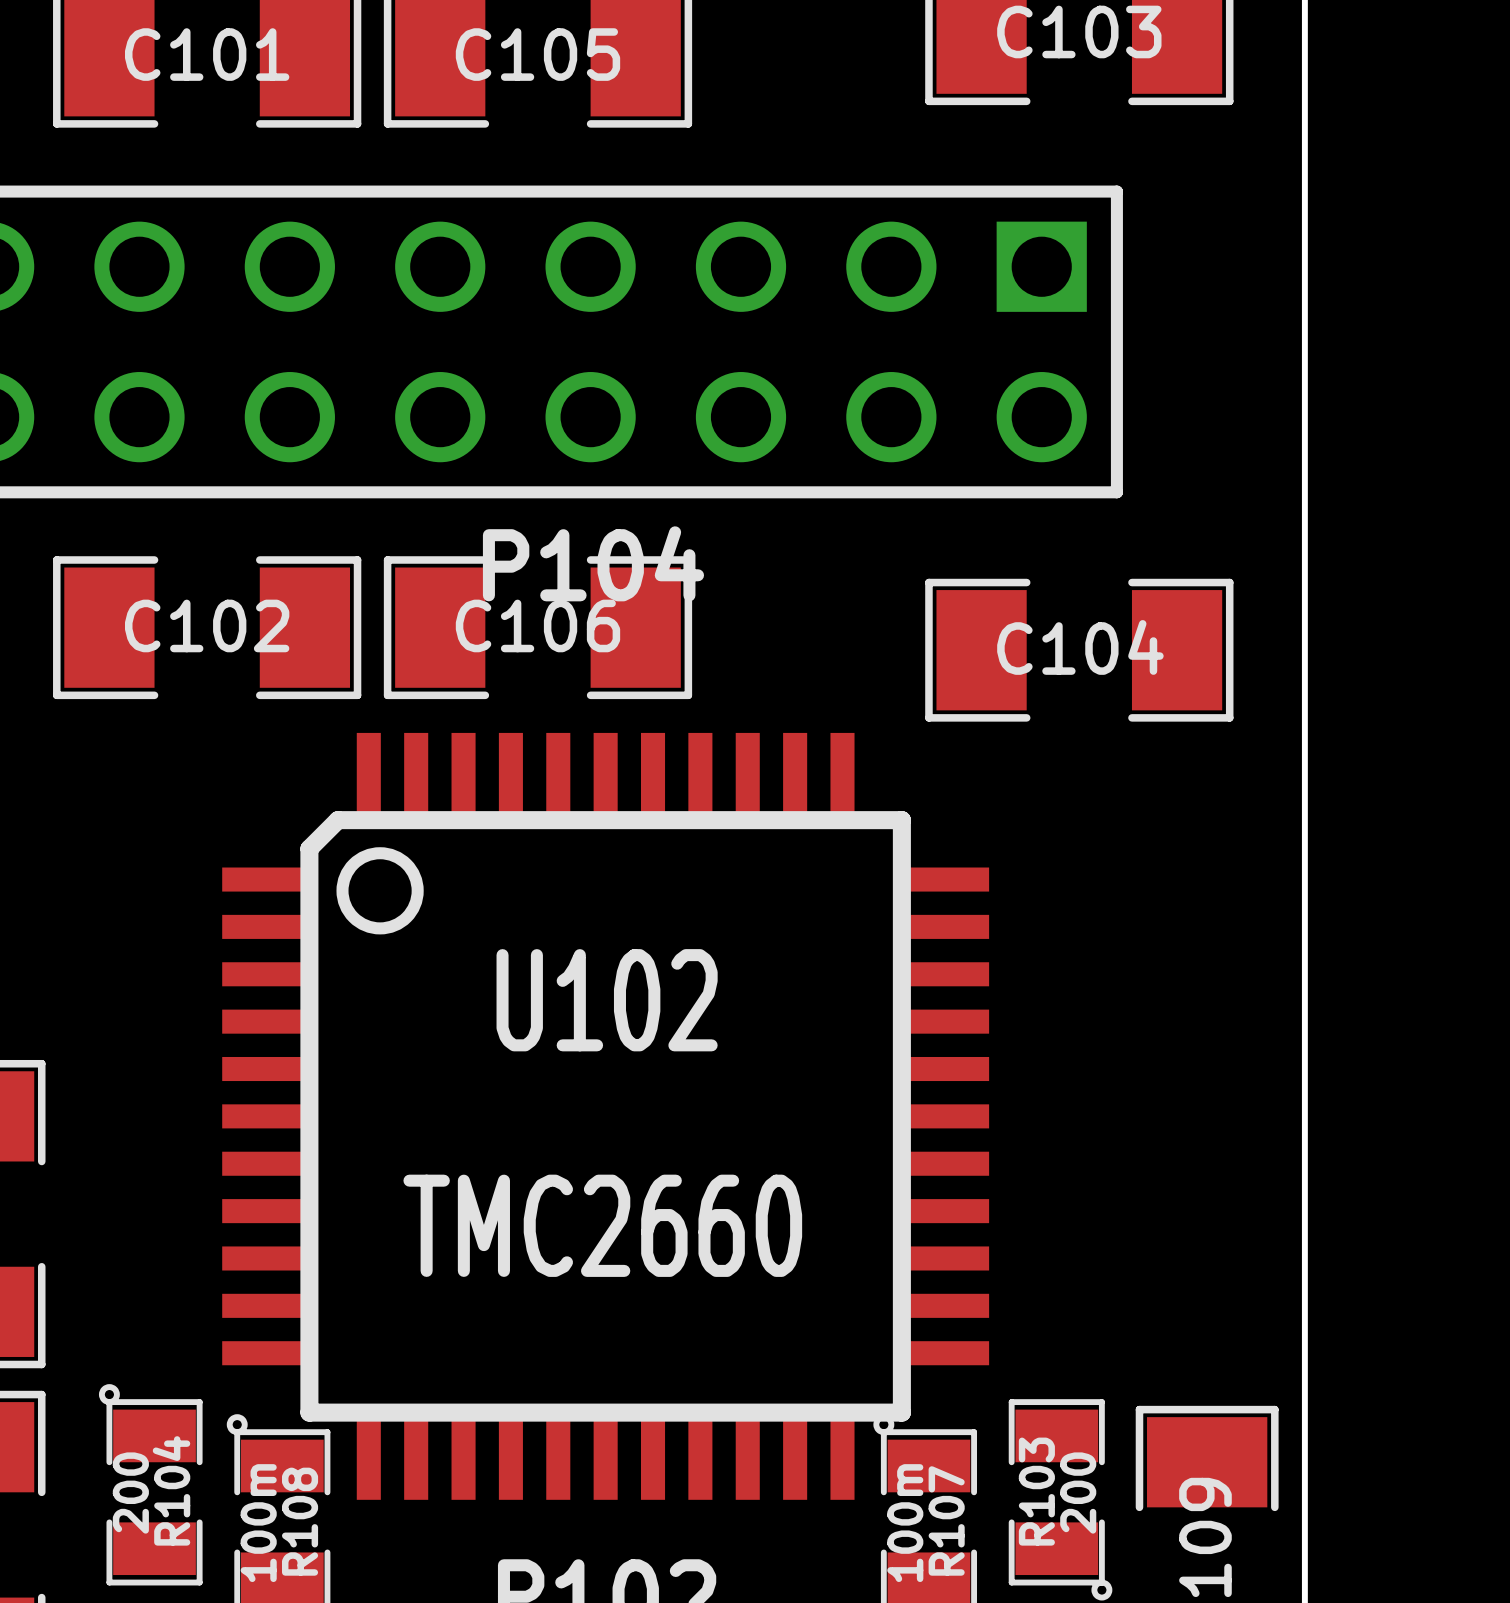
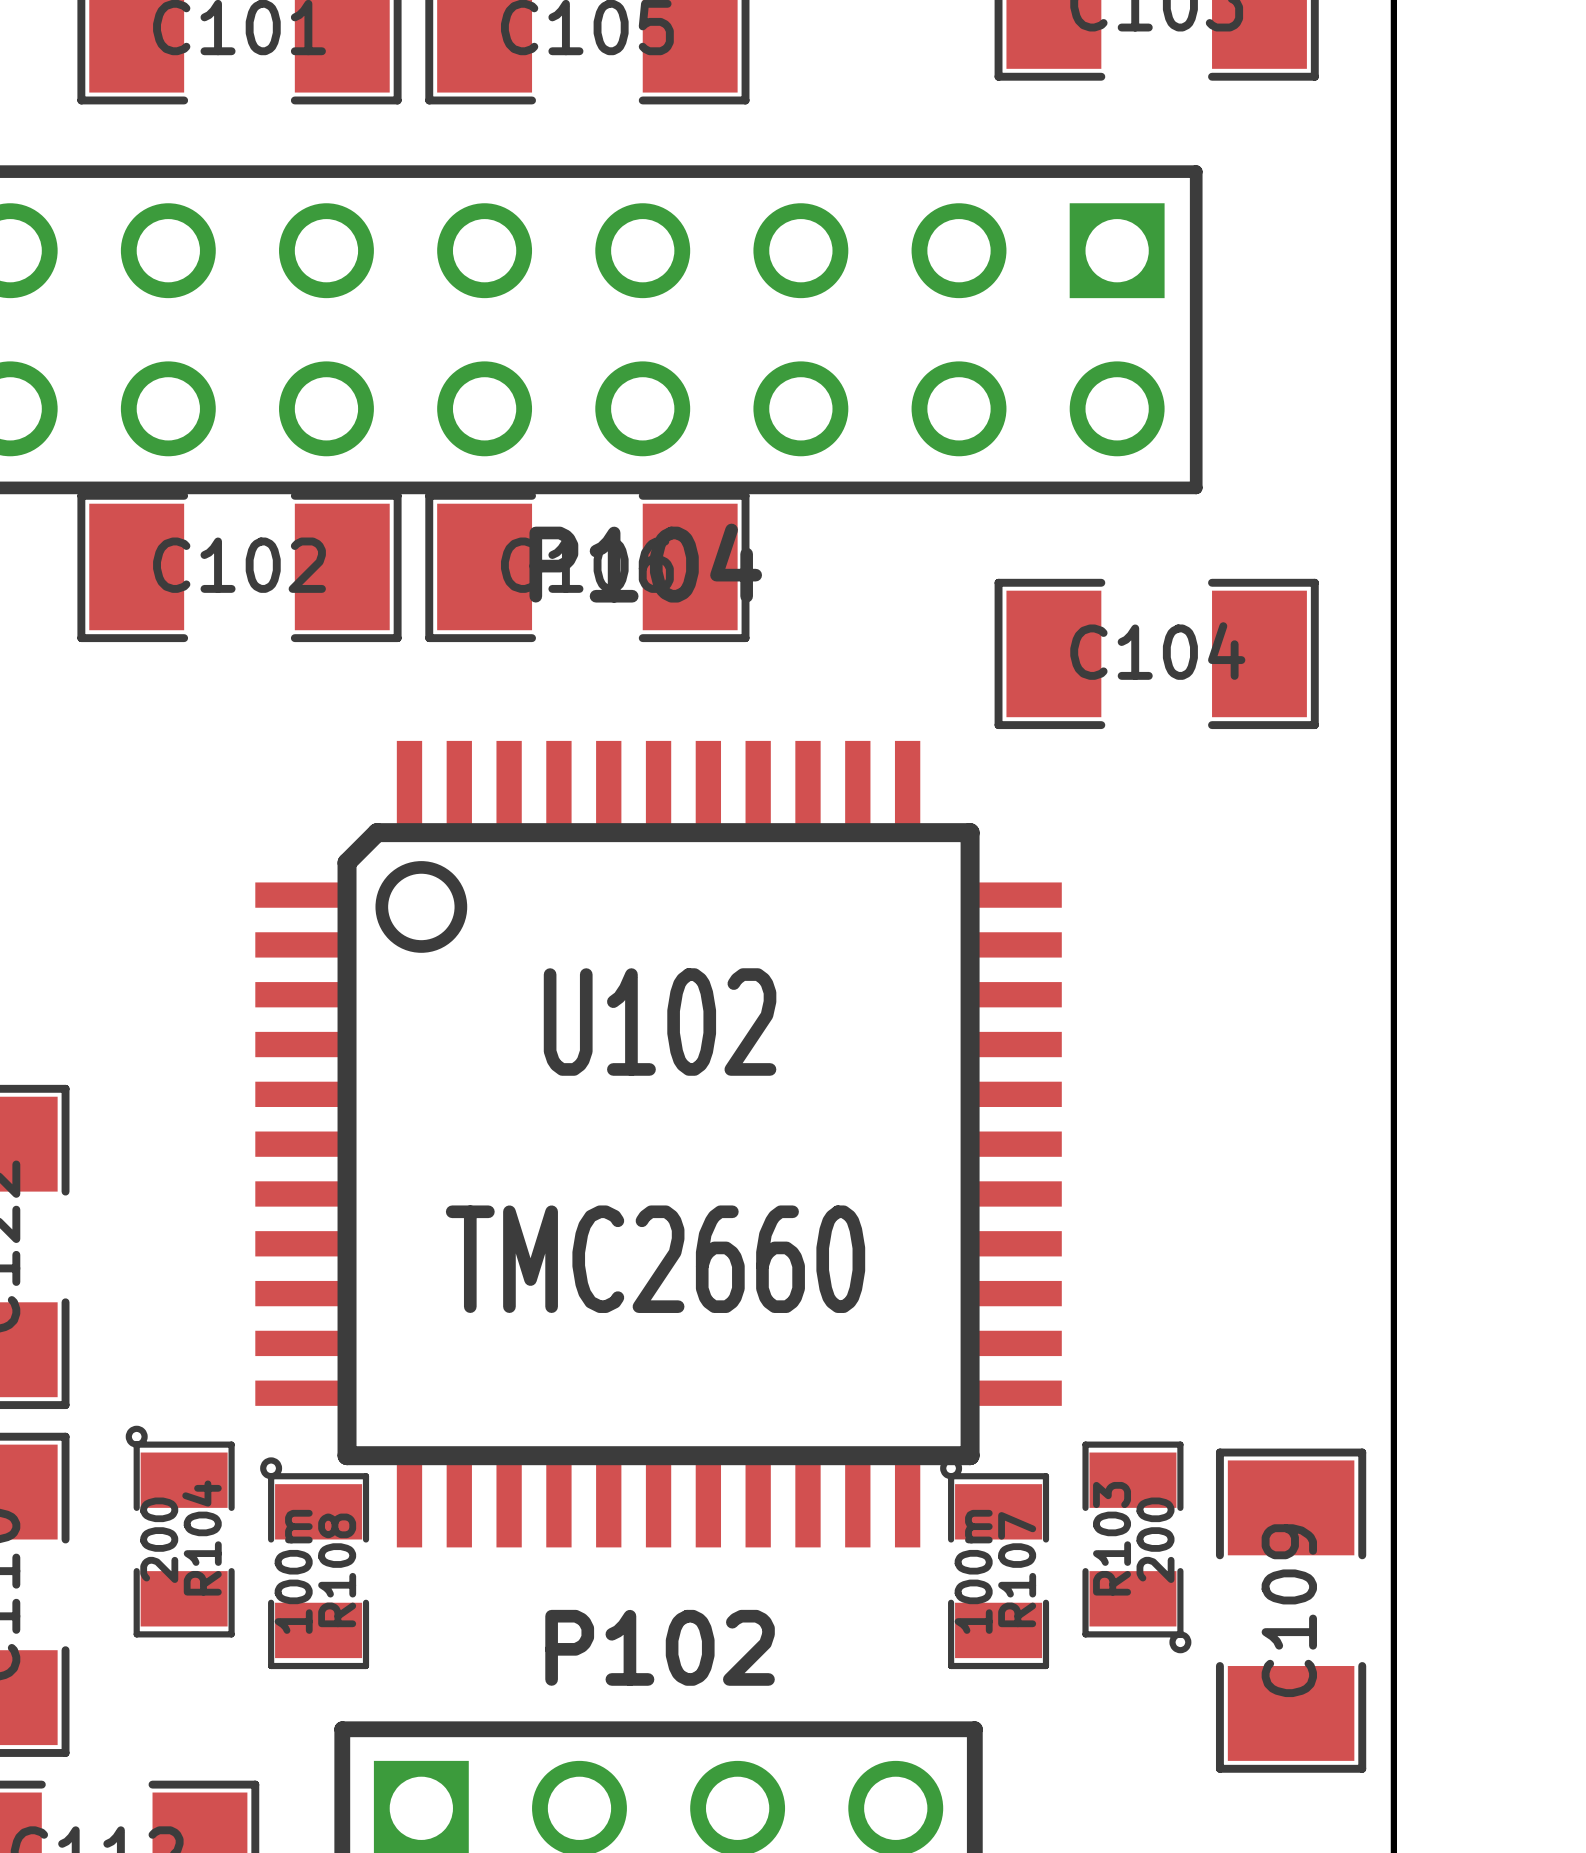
C102 position: (207, 627) -> (239, 566)
C106 position: (537, 627) -> (587, 566)

